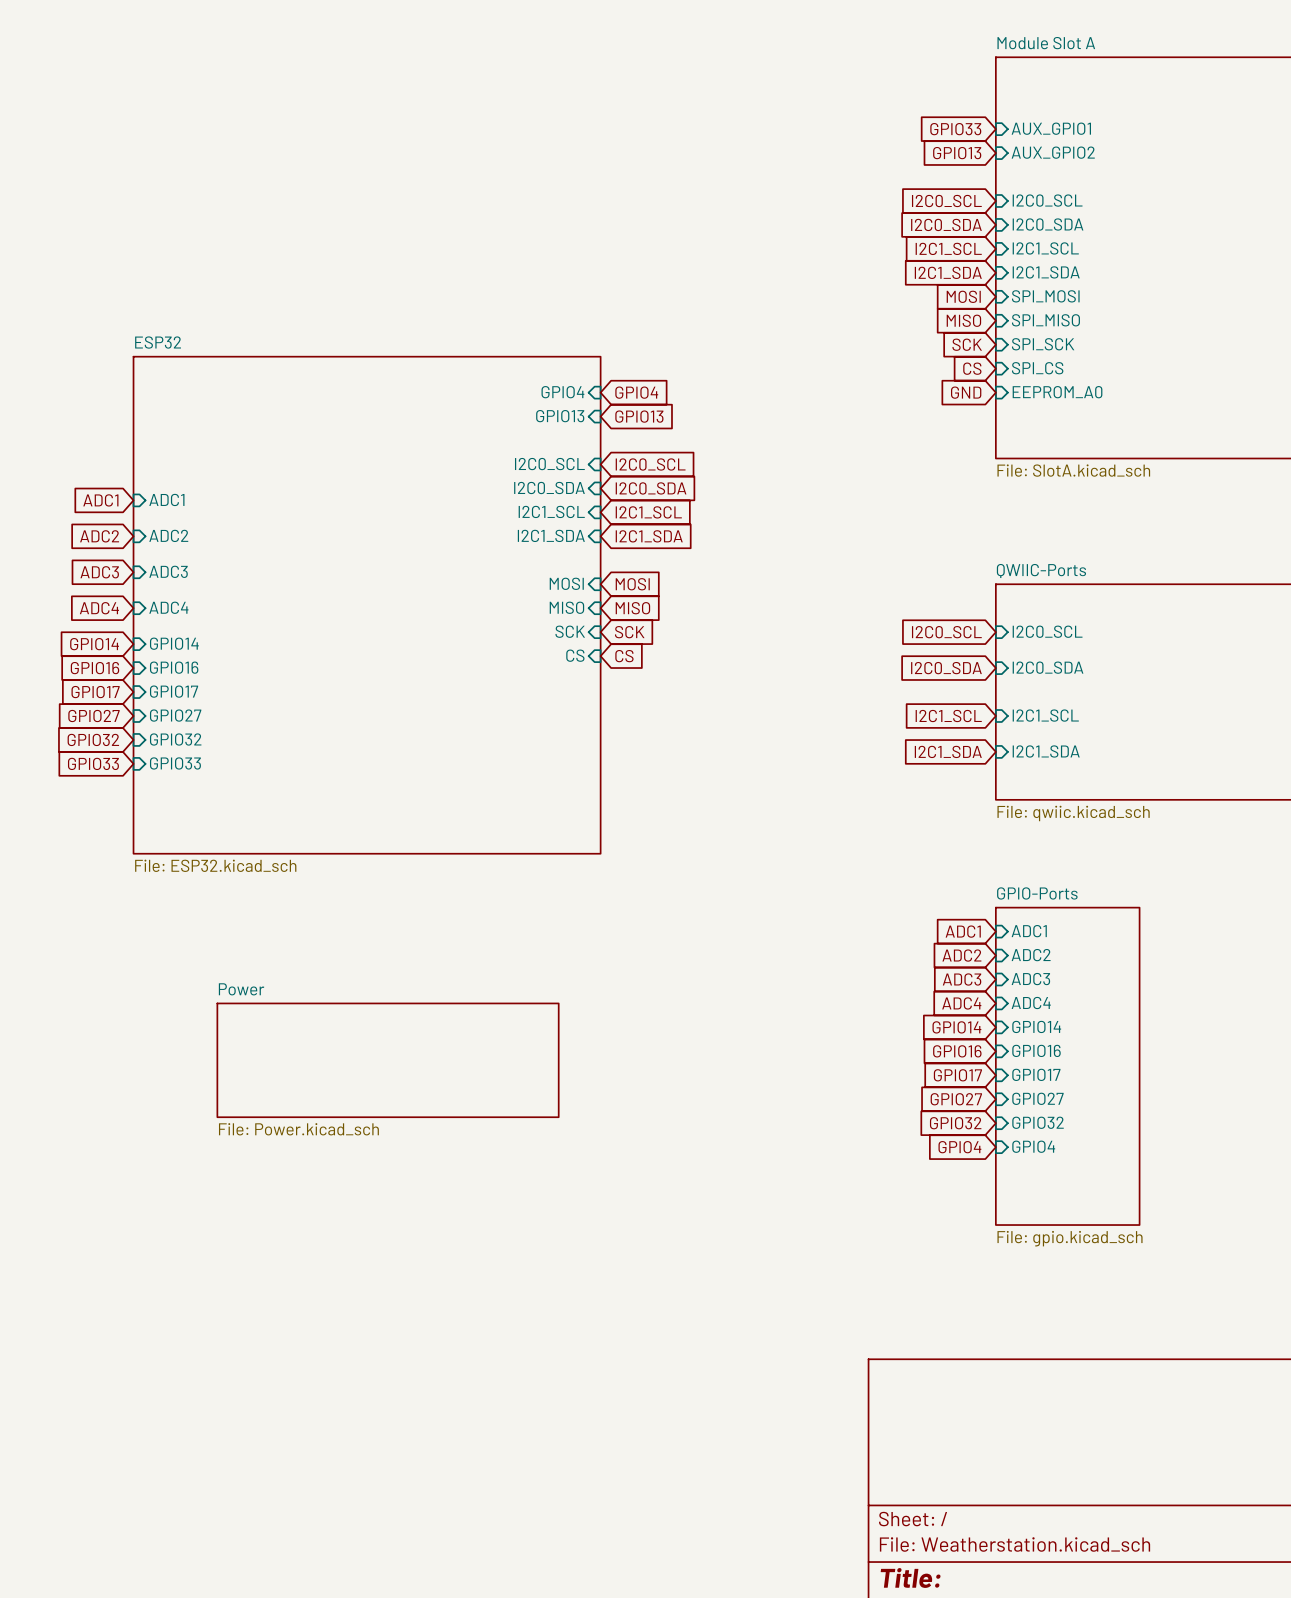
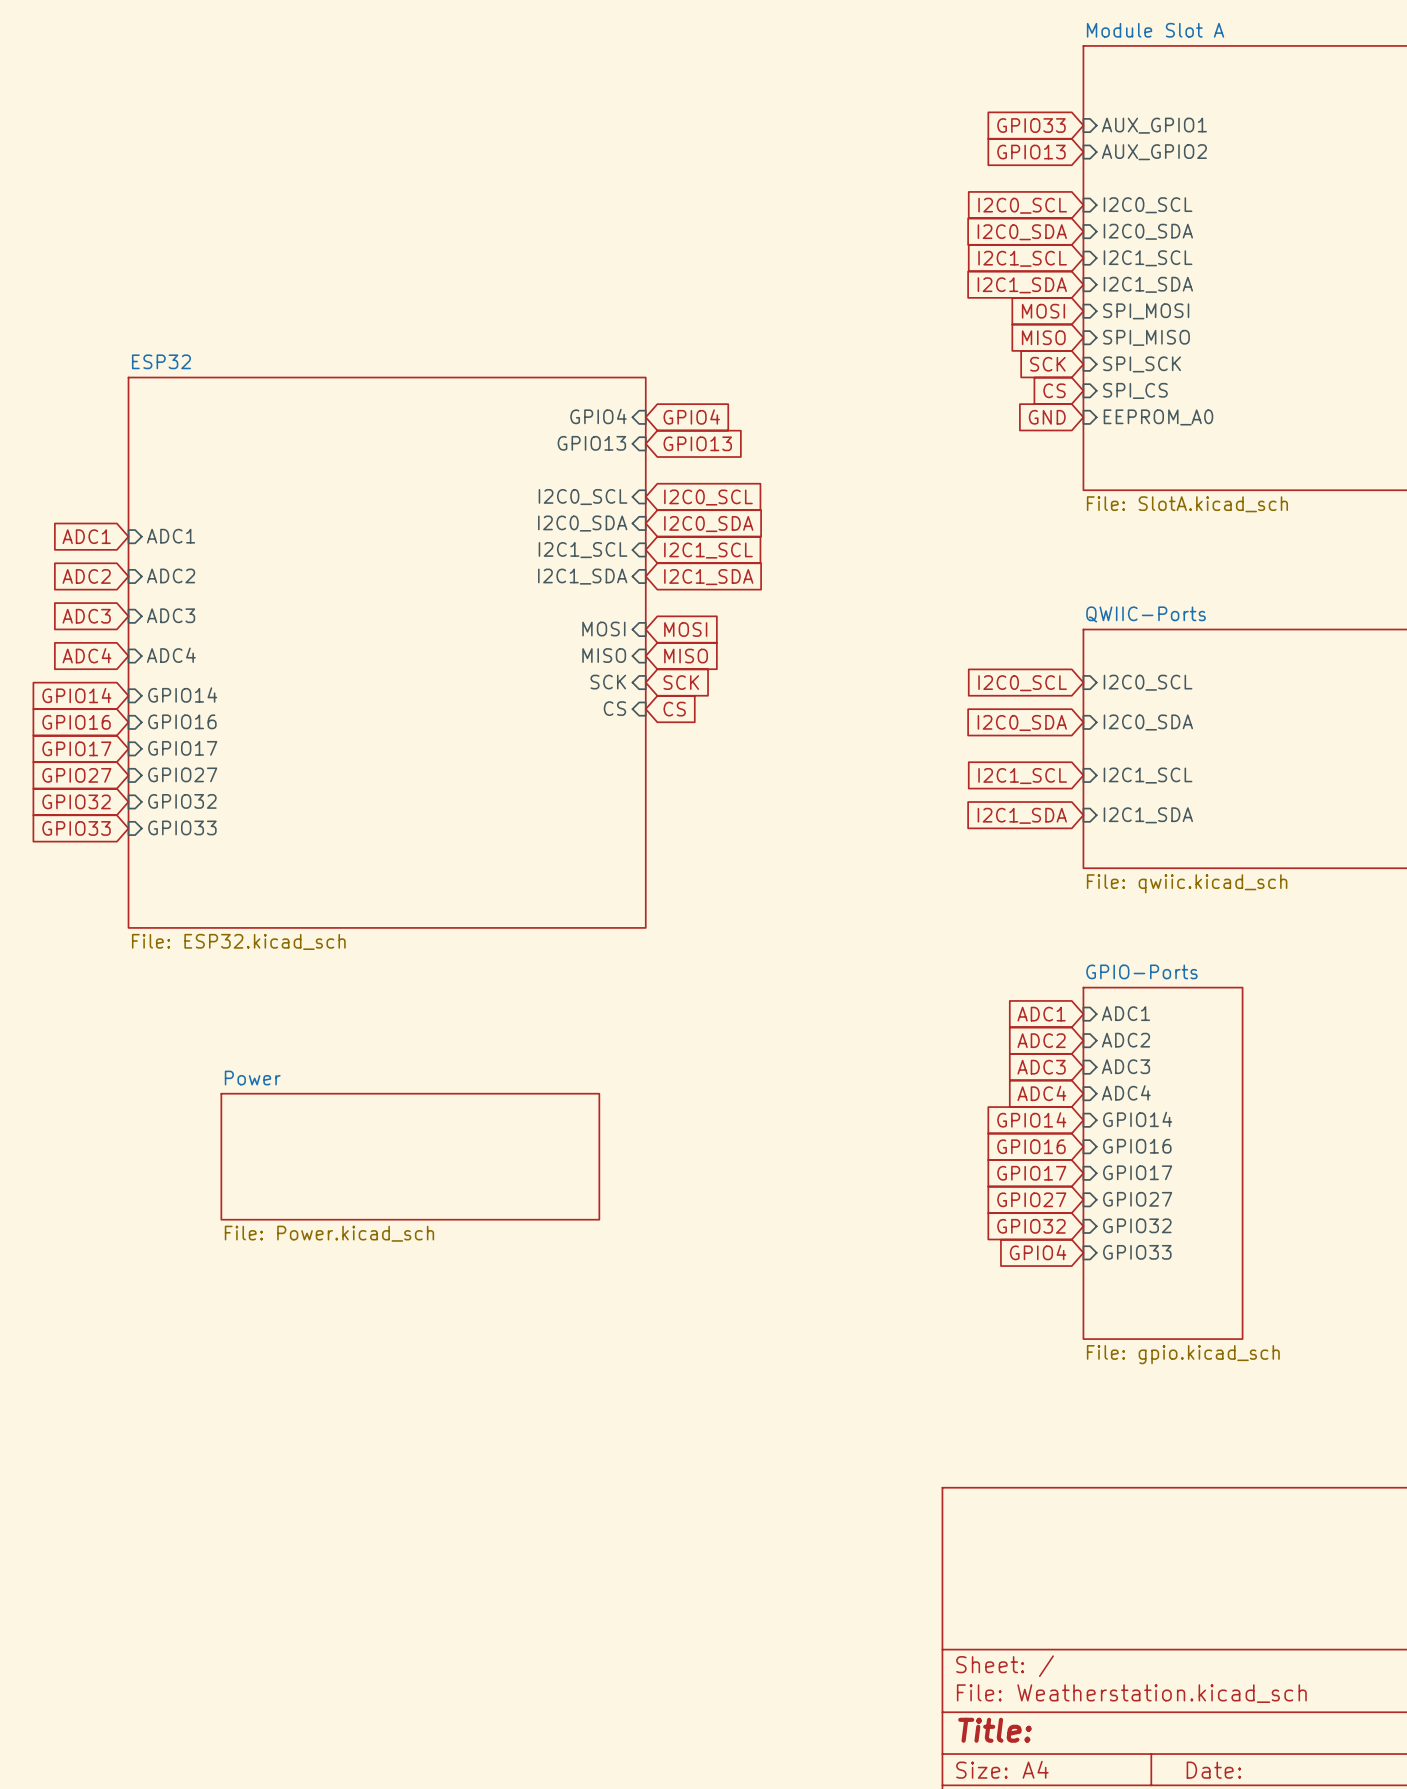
sheet pin: GPIO4 (1033, 1146) -> GPIO33 (1137, 1252)

